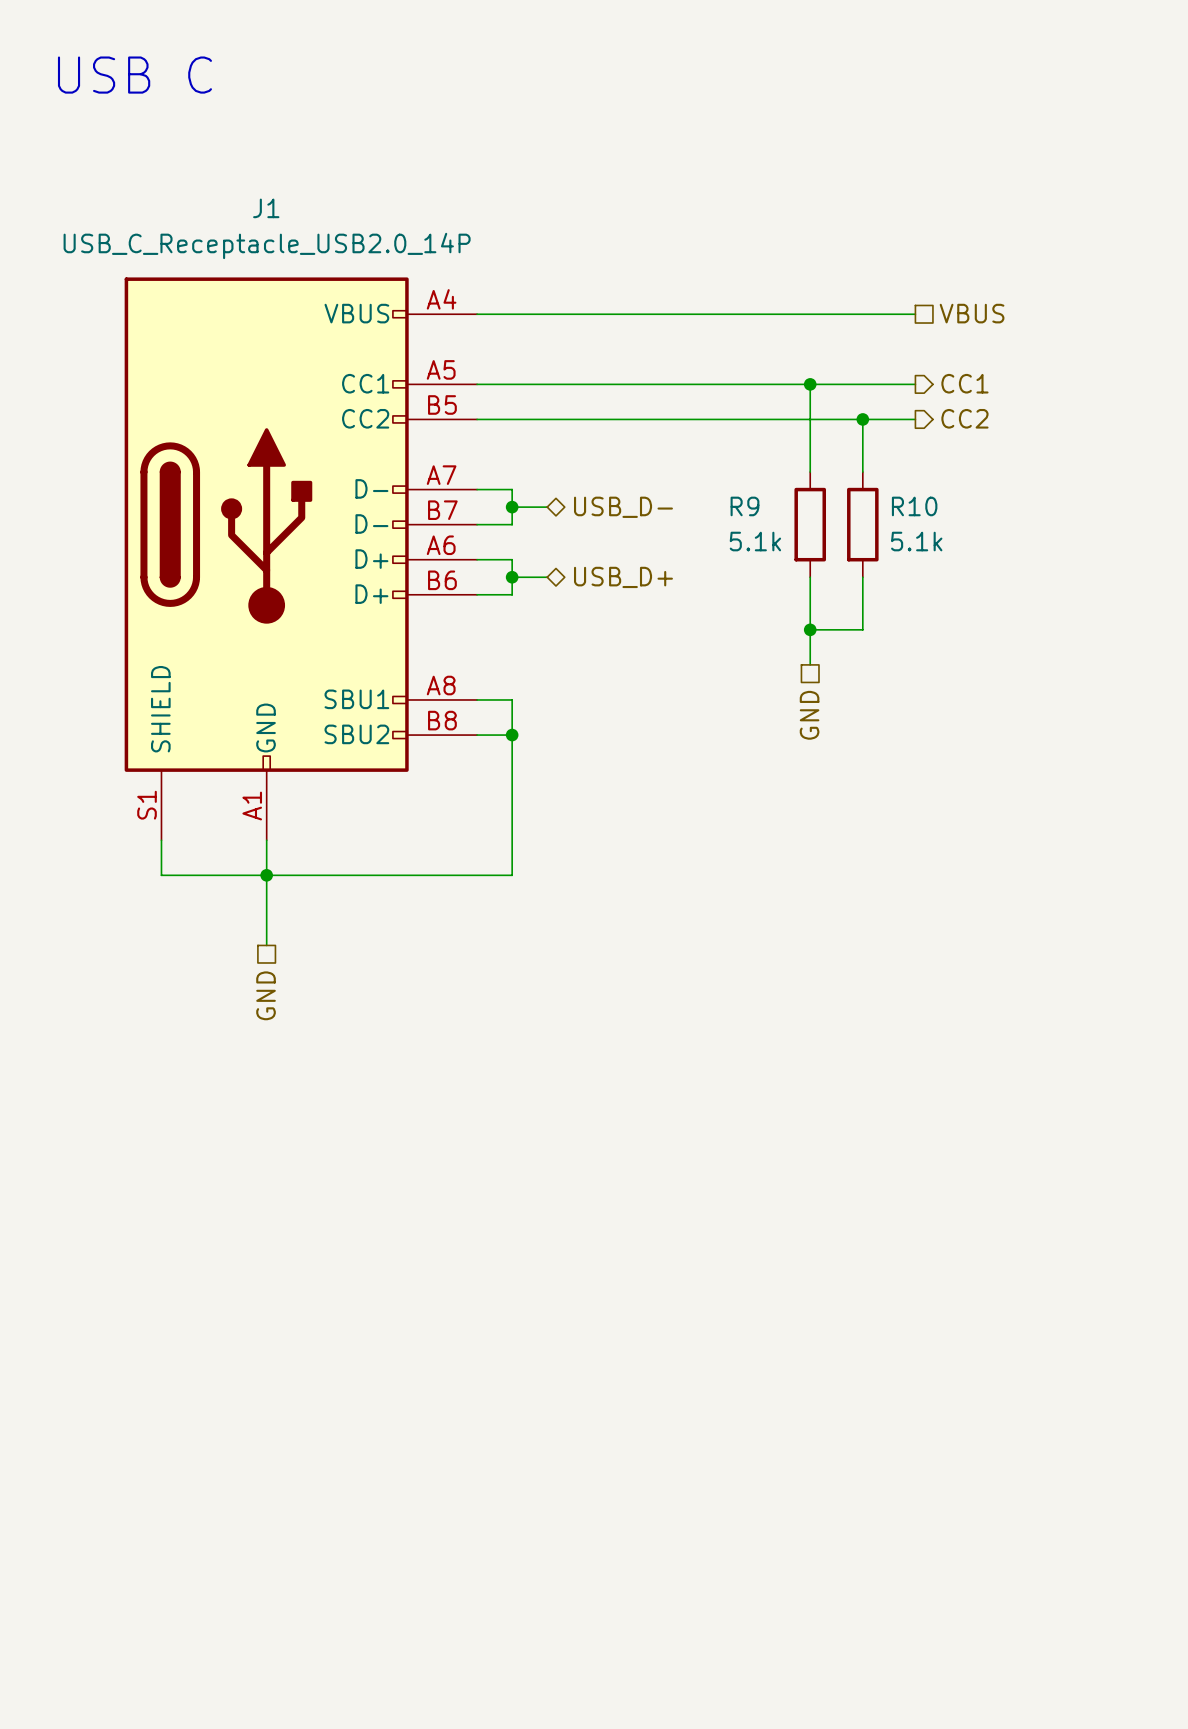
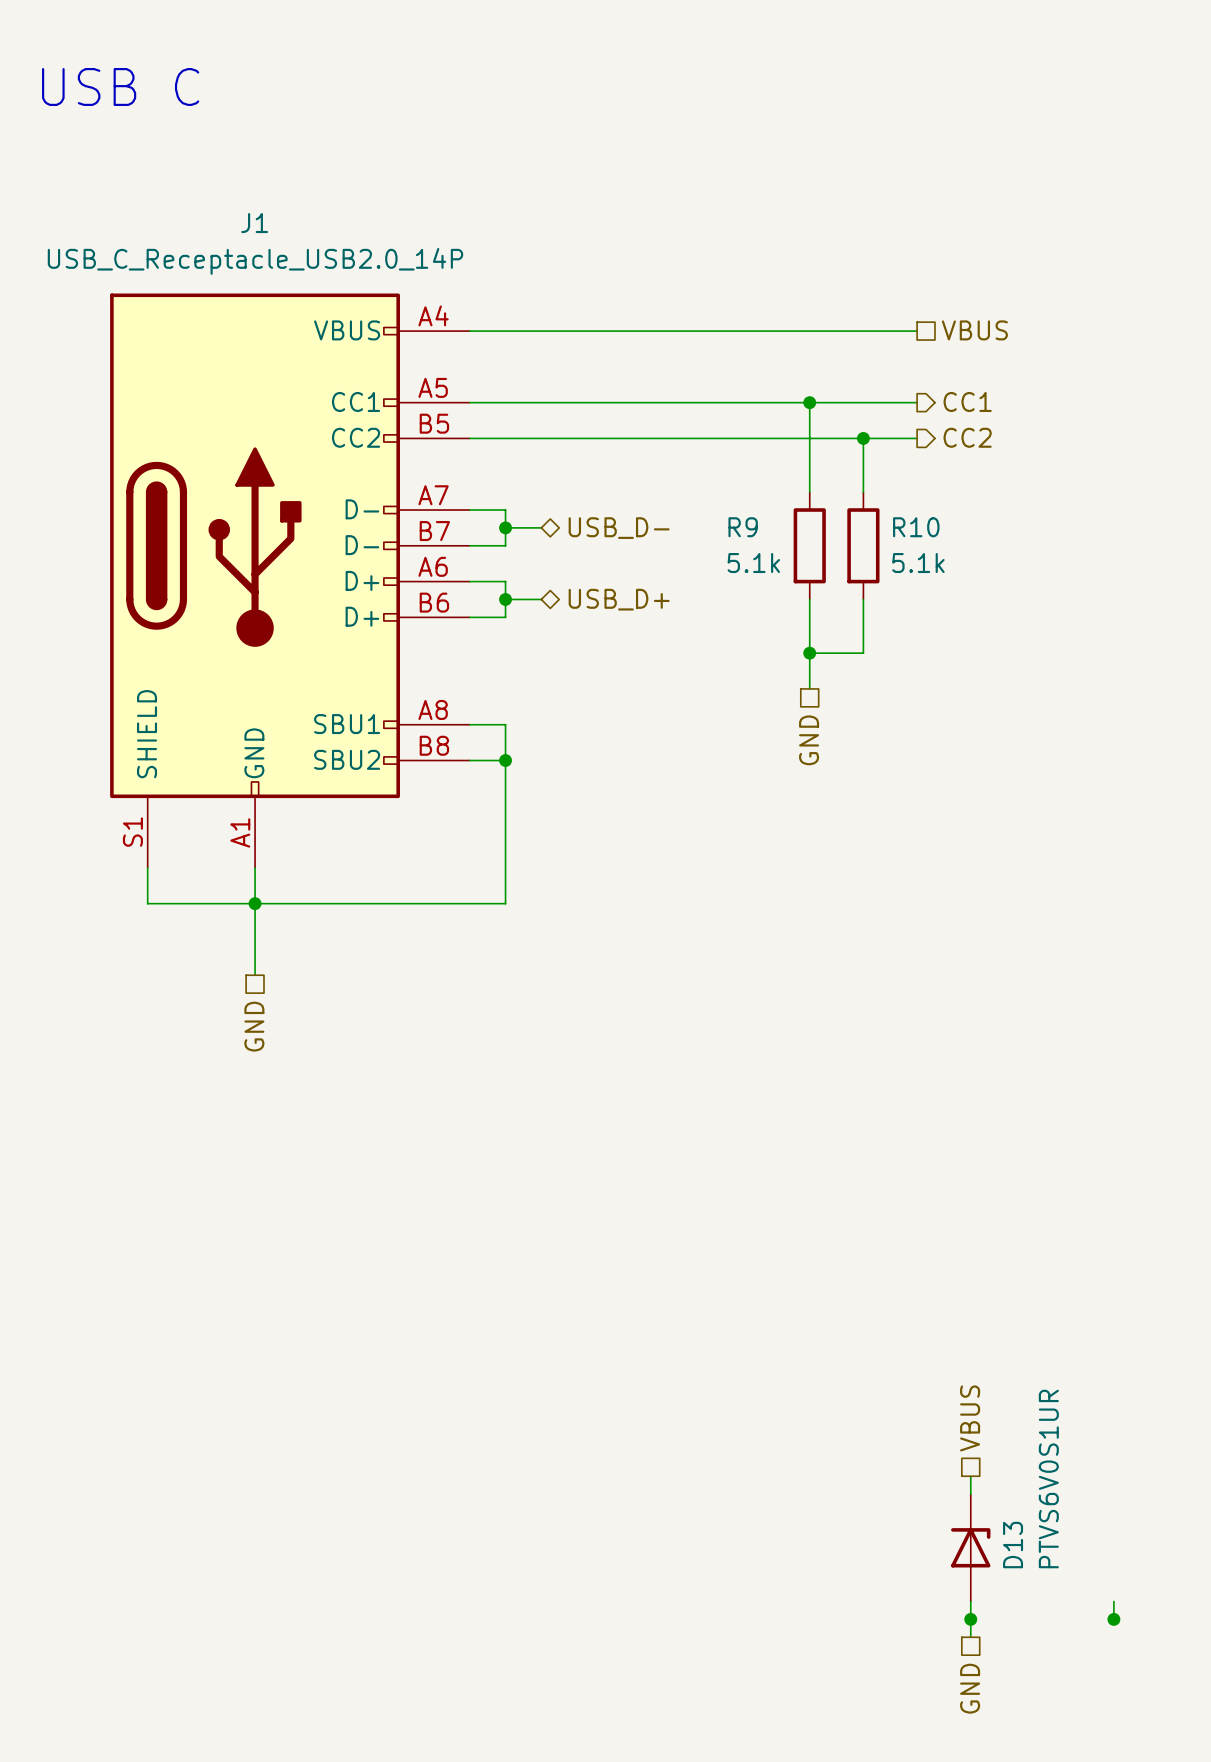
hierarchical label: none -> VBUS (970, 1418)
wire: none -> (970, 1476) (970, 1494)
D13: none -> PTVS6V0S1UR (970, 1547)
wire: none -> (970, 1601) (970, 1637)
wire: none -> (1113, 1601) (1113, 1619)
junction: none -> (970, 1619)
junction: none -> (1113, 1619)
hierarchical label: none -> GND (970, 1688)

